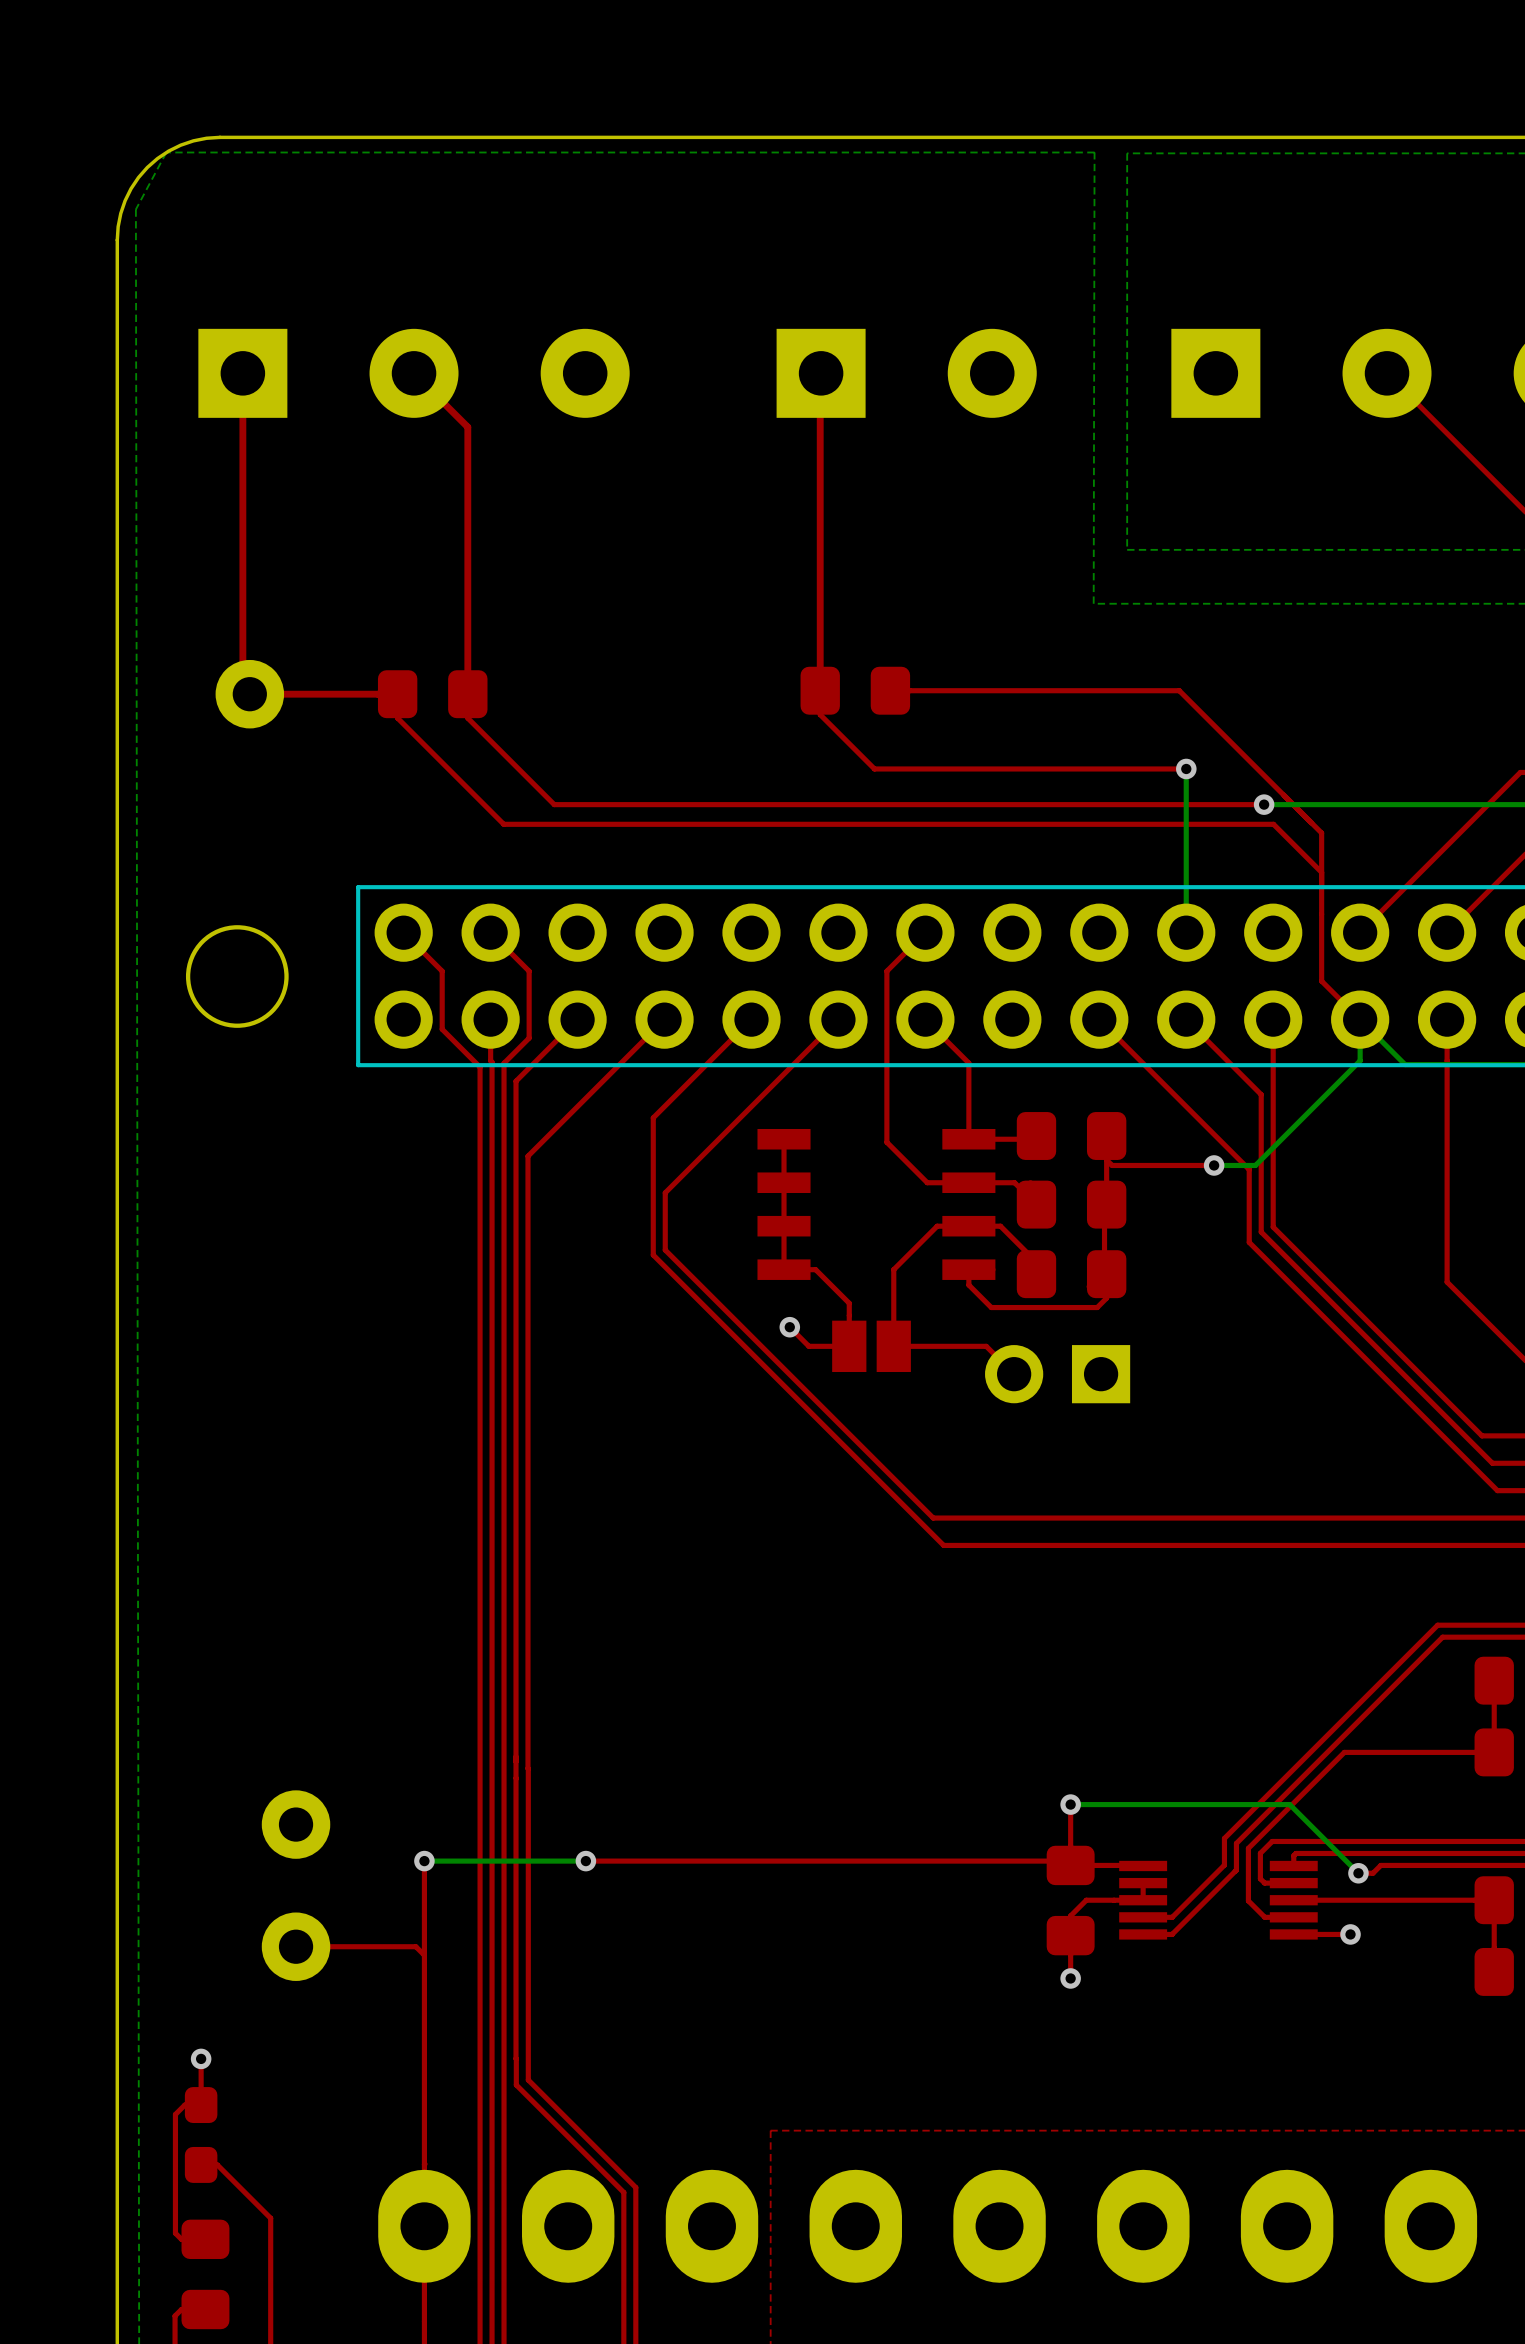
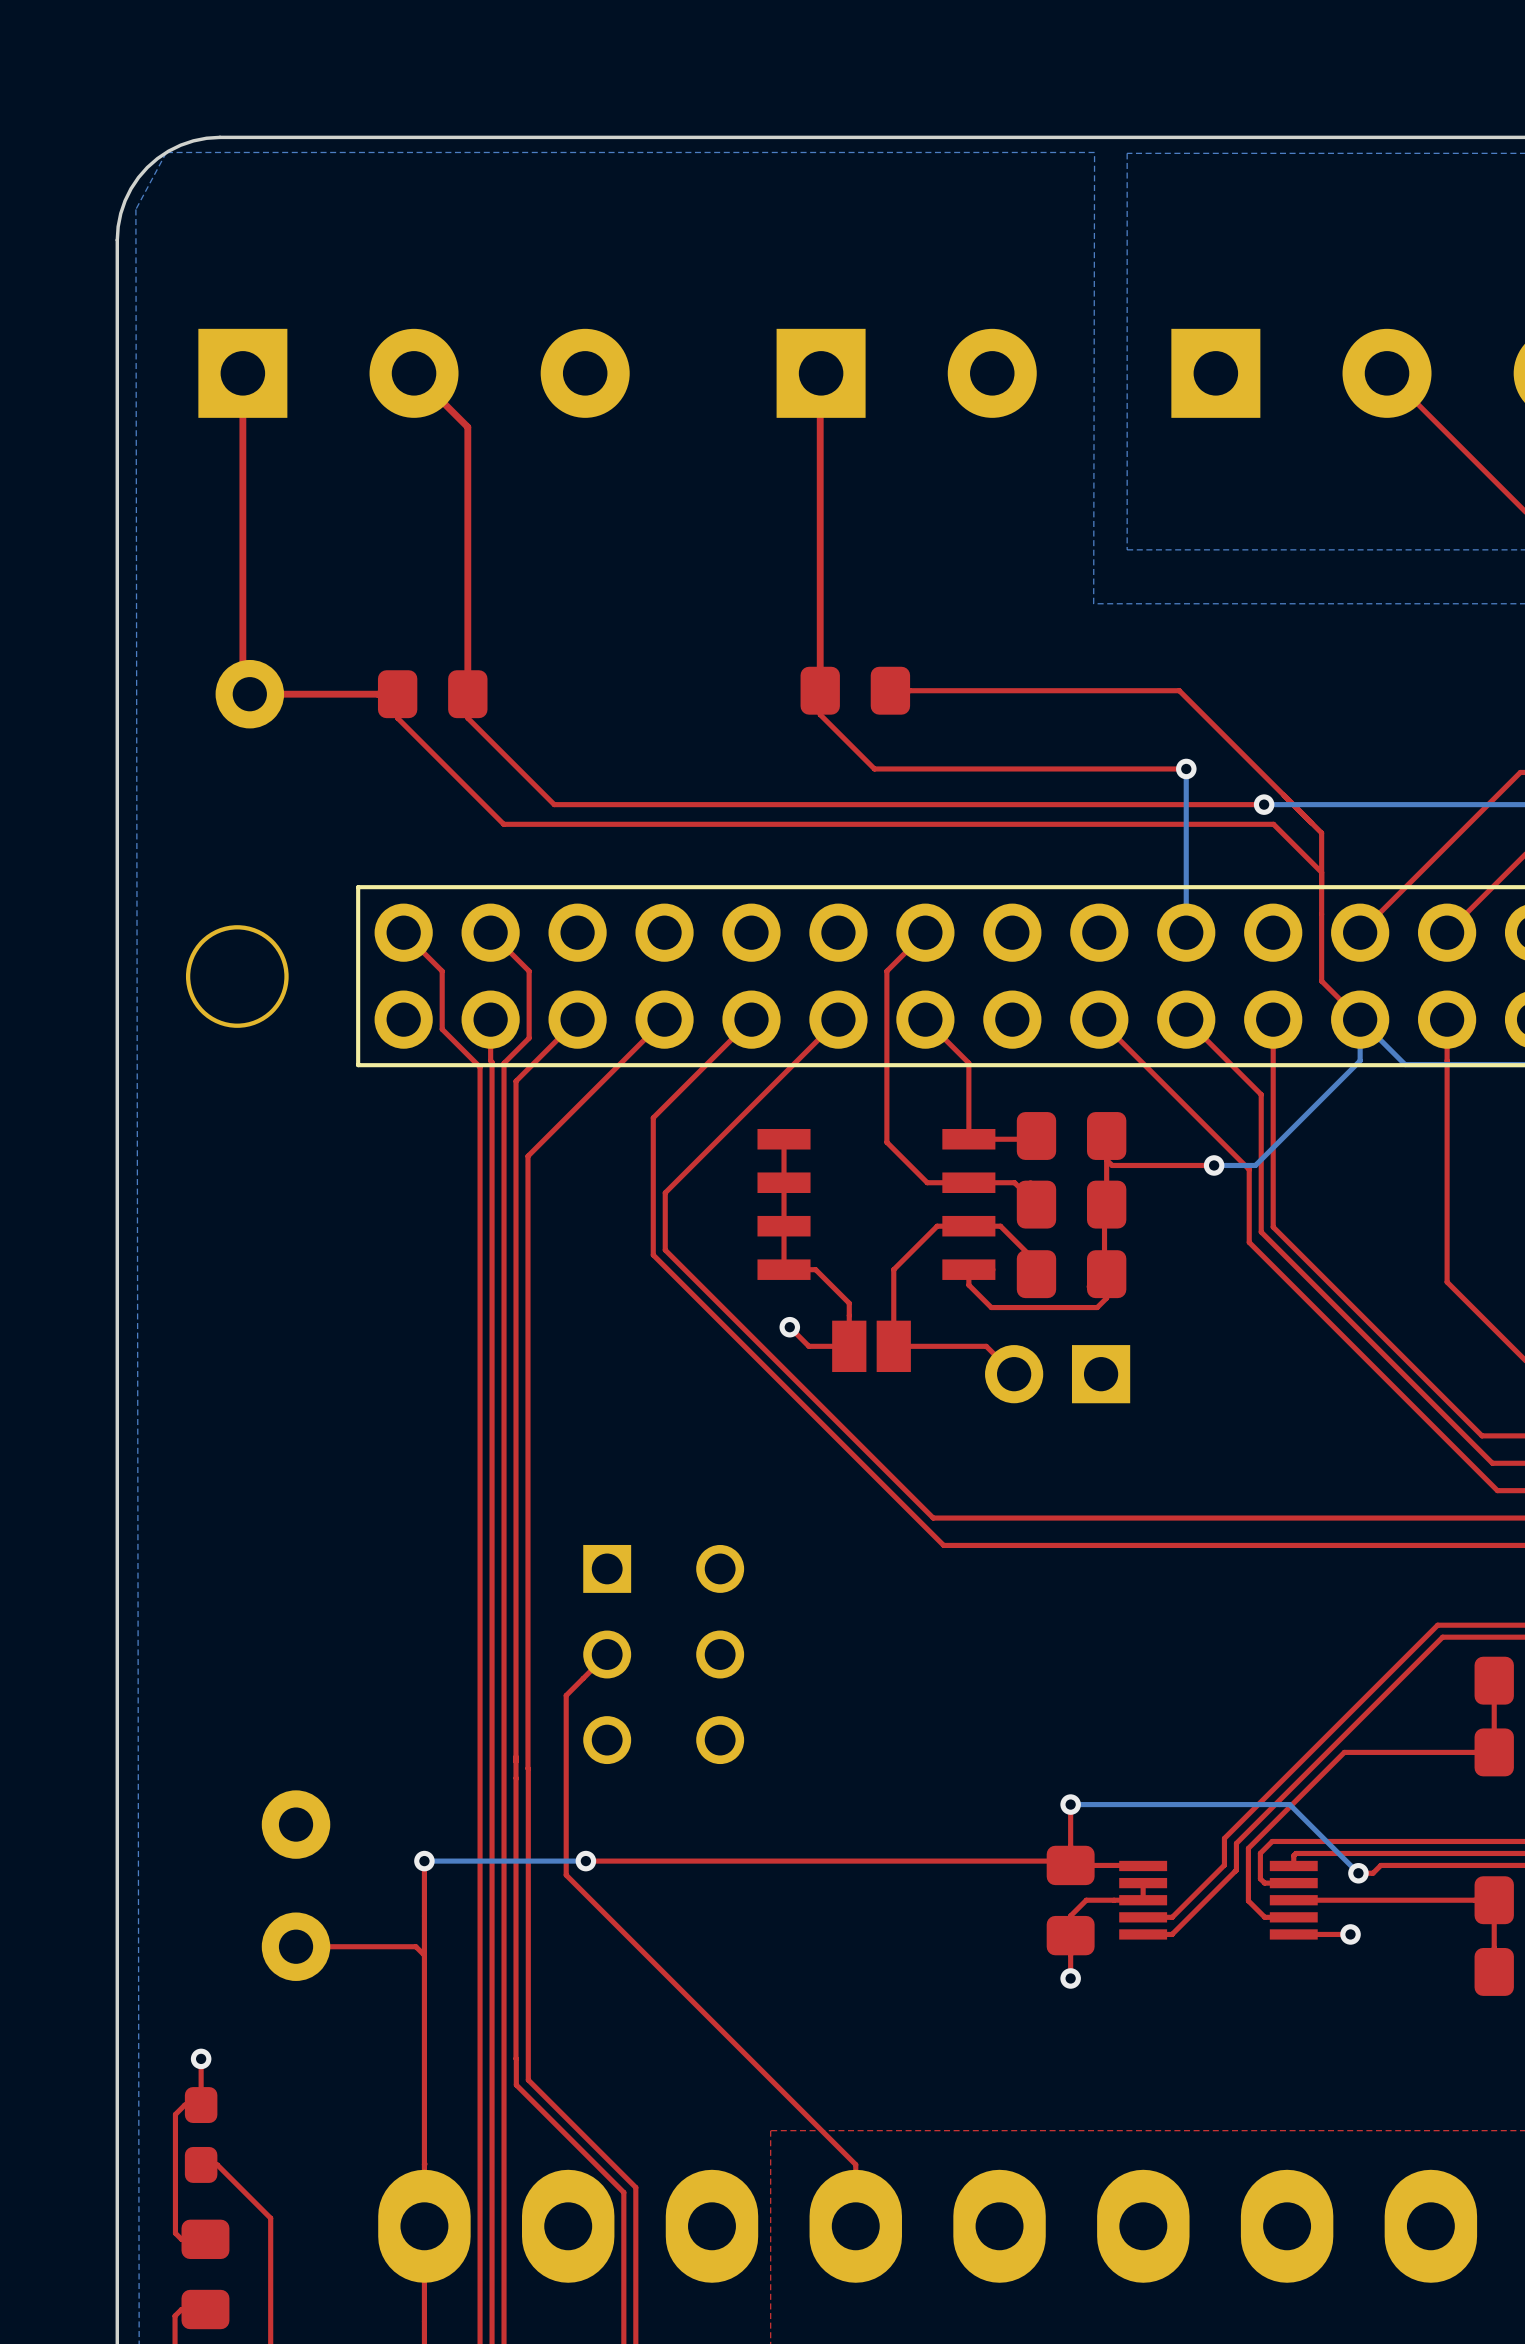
top track: none -> (607, 1654) (566, 1695) (566, 1875) (855, 2164) (855, 2226)
part: none -> (663, 1654)

